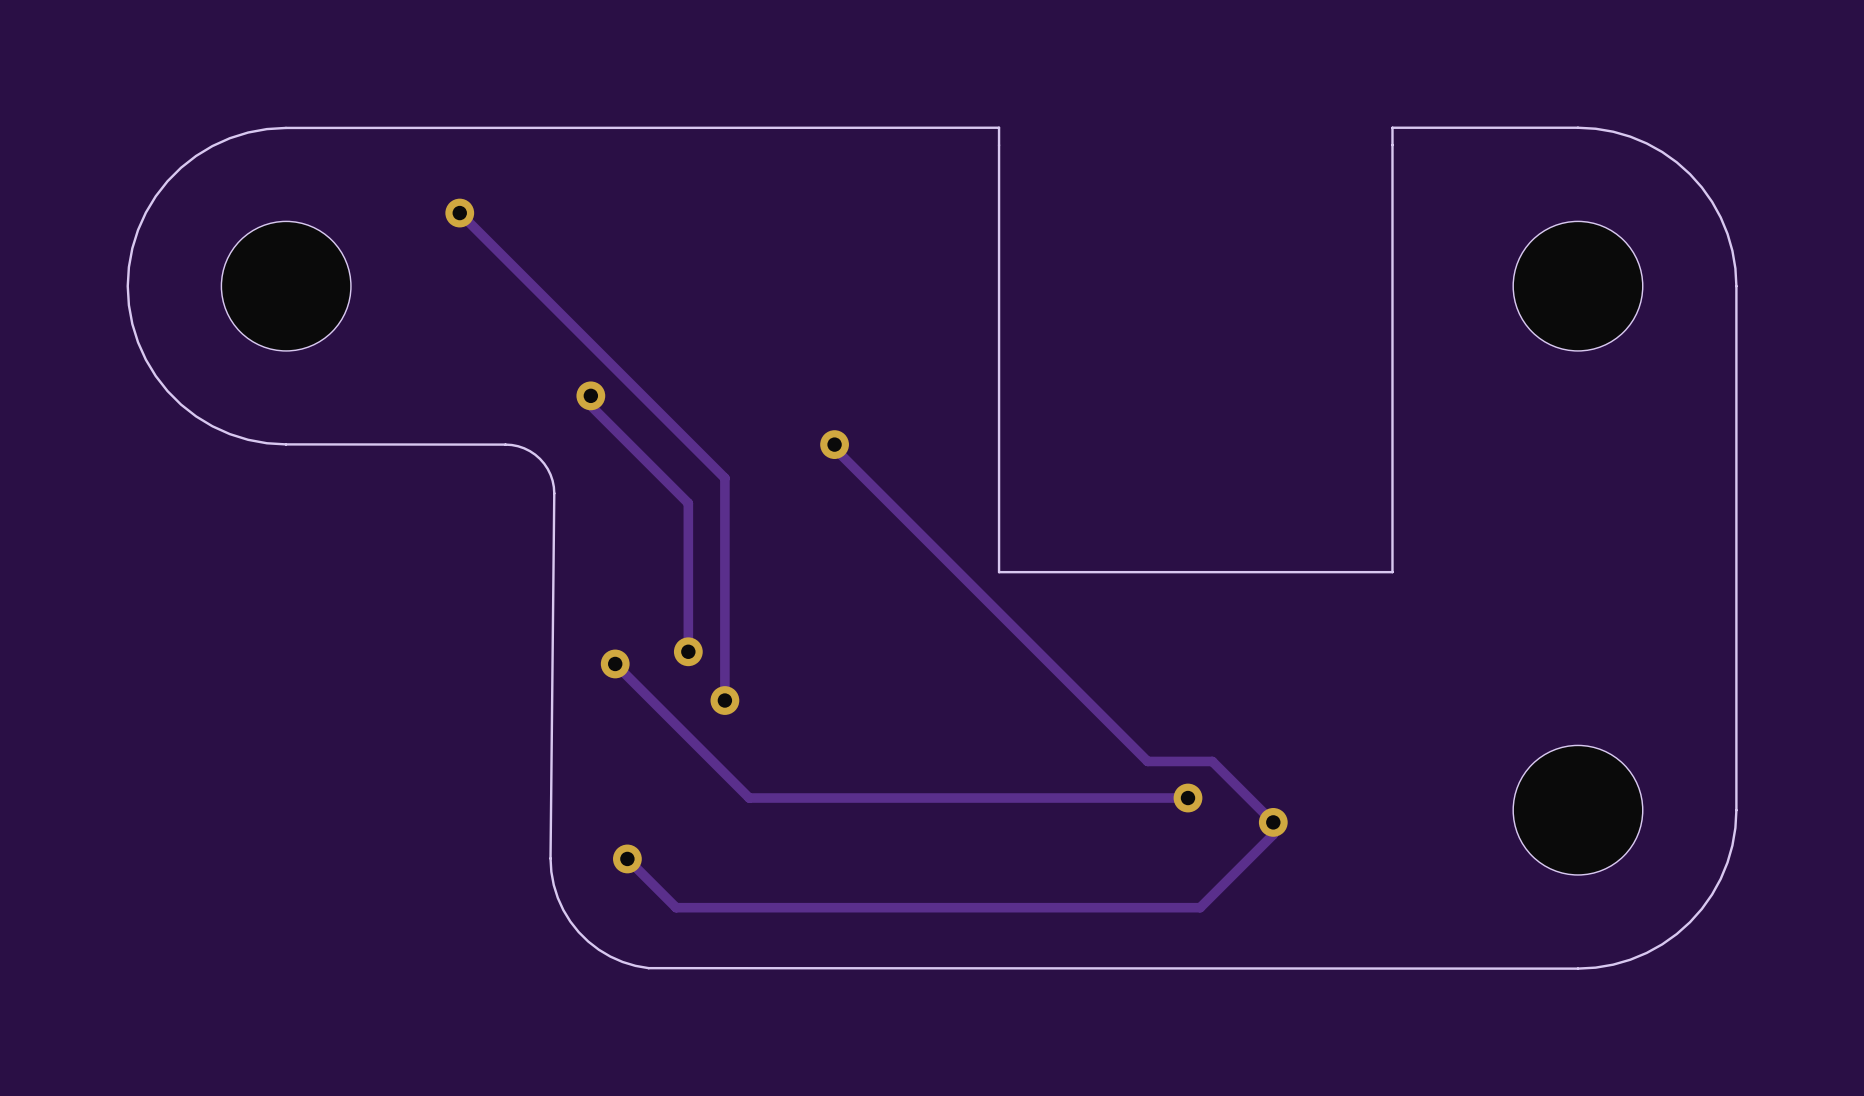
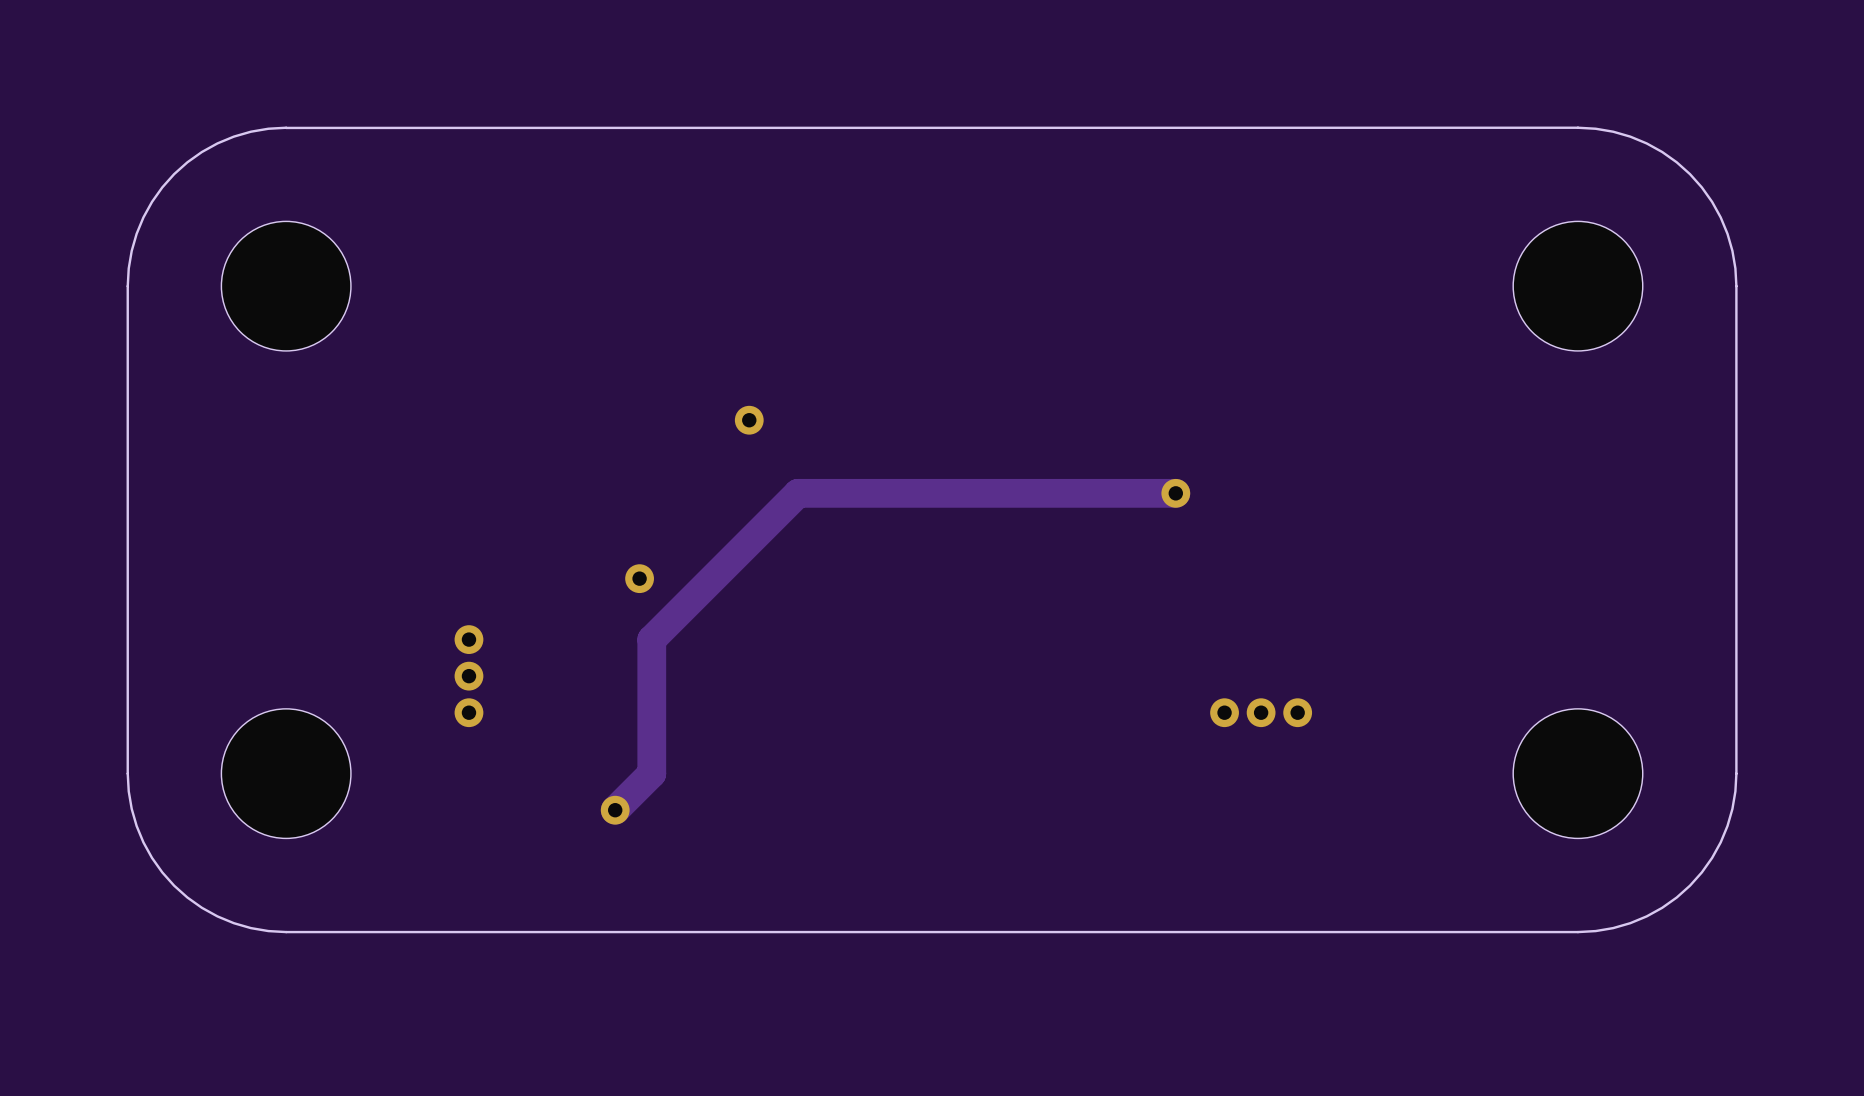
board edge: (1577, 127) (1392, 127) (1392, 145) -> none
board edge: (999, 145) (999, 127) (285, 127) (248, 132) (212, 146) (196, 155) (181, 167) (155, 196) (138, 230) (132, 248) (127, 286) (132, 324) (145, 359) (167, 391) (196, 416) (229, 434) (266, 443) (285, 444) (511, 445) (529, 451) (544, 463) (550, 474) (554, 493) (551, 871) (557, 897) (570, 921) (578, 932) (598, 949) (622, 961) (635, 965) (648, 968) (1577, 968) (1613, 964) (1646, 952) (1676, 934) (1689, 922) (1712, 894) (1720, 878) (1732, 845) (1736, 810) (1736, 773) -> (1577, 127) (285, 127) (250, 131) (217, 143) (201, 152) (174, 174) (152, 201) (136, 233) (128, 268) (127, 773) (131, 808) (143, 842) (152, 857) (162, 872) (187, 897) (217, 916) (250, 928) (268, 931) (1577, 932) (1595, 931) (1630, 923) (1662, 907) (1689, 885) (1712, 857) (1720, 842) (1732, 808) (1736, 773)
track: (459, 213) (724, 478) (724, 700) -> none
via: (459, 213) -> none
part: (1195, 358) -> none
track: (590, 395) (590, 405) (688, 503) (688, 651) -> none
via: (590, 395) -> none
via: none -> (749, 420)
track: (834, 444) (834, 448) (1147, 761) (1212, 761) (1273, 822) (1273, 834) (1200, 907) (676, 907) (627, 858) -> none
via: (834, 444) -> none
track: none -> (1175, 493) (798, 493) (651, 639) (651, 773) (615, 810)
via: none -> (1175, 493)
via: none -> (639, 578)
via: none -> (468, 639)
via: (688, 651) -> none
track: (615, 663) (749, 798) (1187, 798) -> none
via: (615, 663) -> none
via: none -> (468, 676)
via: (724, 700) -> none
via: none -> (468, 712)
via: none -> (1224, 712)
via: none -> (1261, 712)
via: none -> (1297, 712)
part: none -> (286, 773)
via: (1187, 798) -> none
part position: (1577, 810) -> (1577, 773)
via: (1273, 822) -> none
via position: (627, 858) -> (615, 810)

